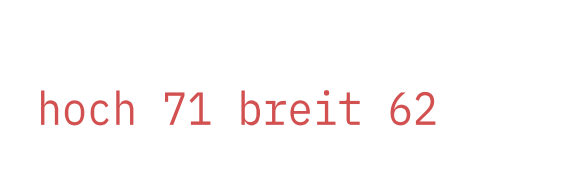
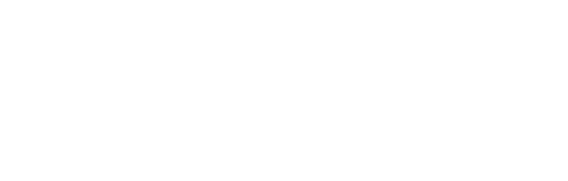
text: hoch 71 breit 62 (238, 107) -> none

